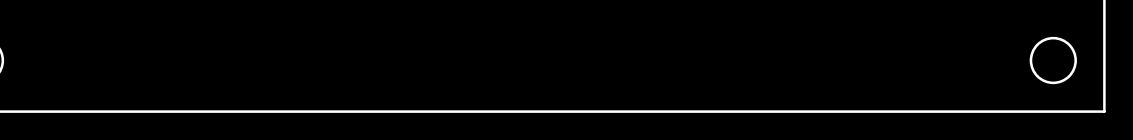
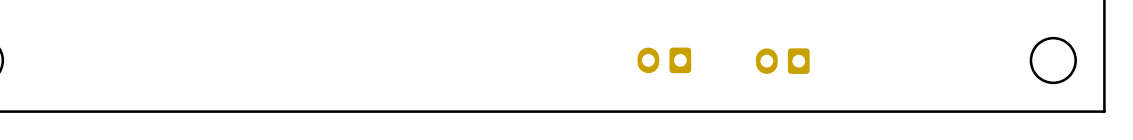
part: none -> (664, 60)
part: none -> (782, 61)

